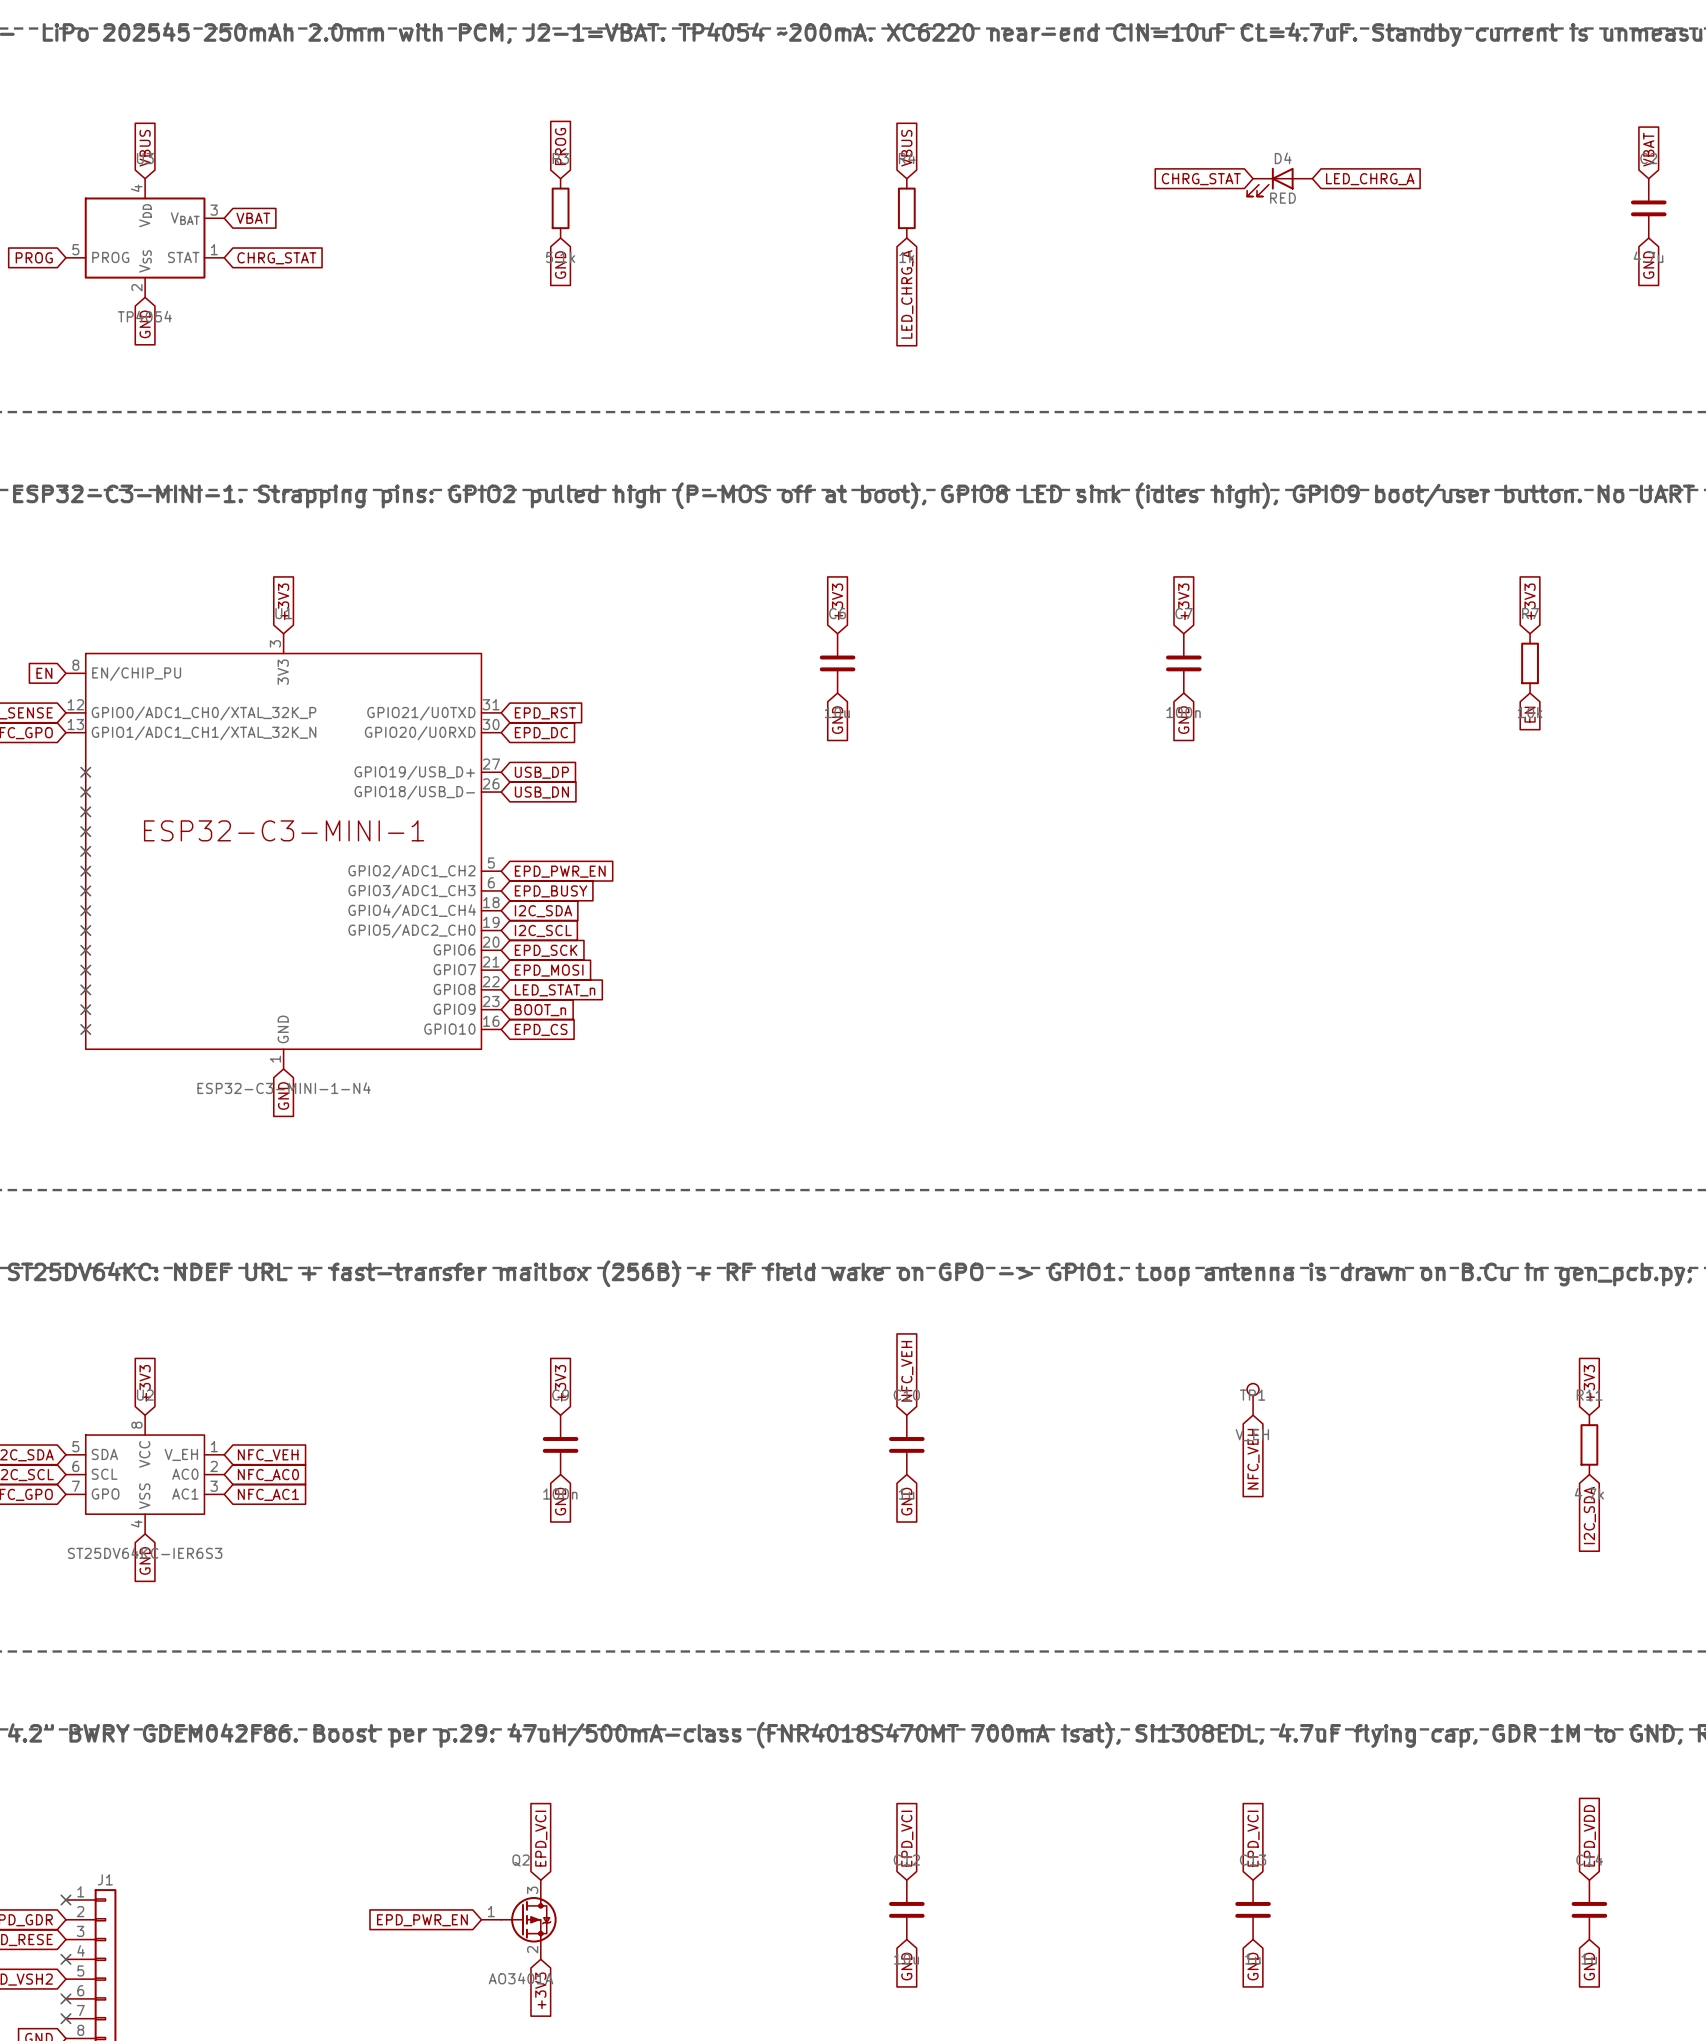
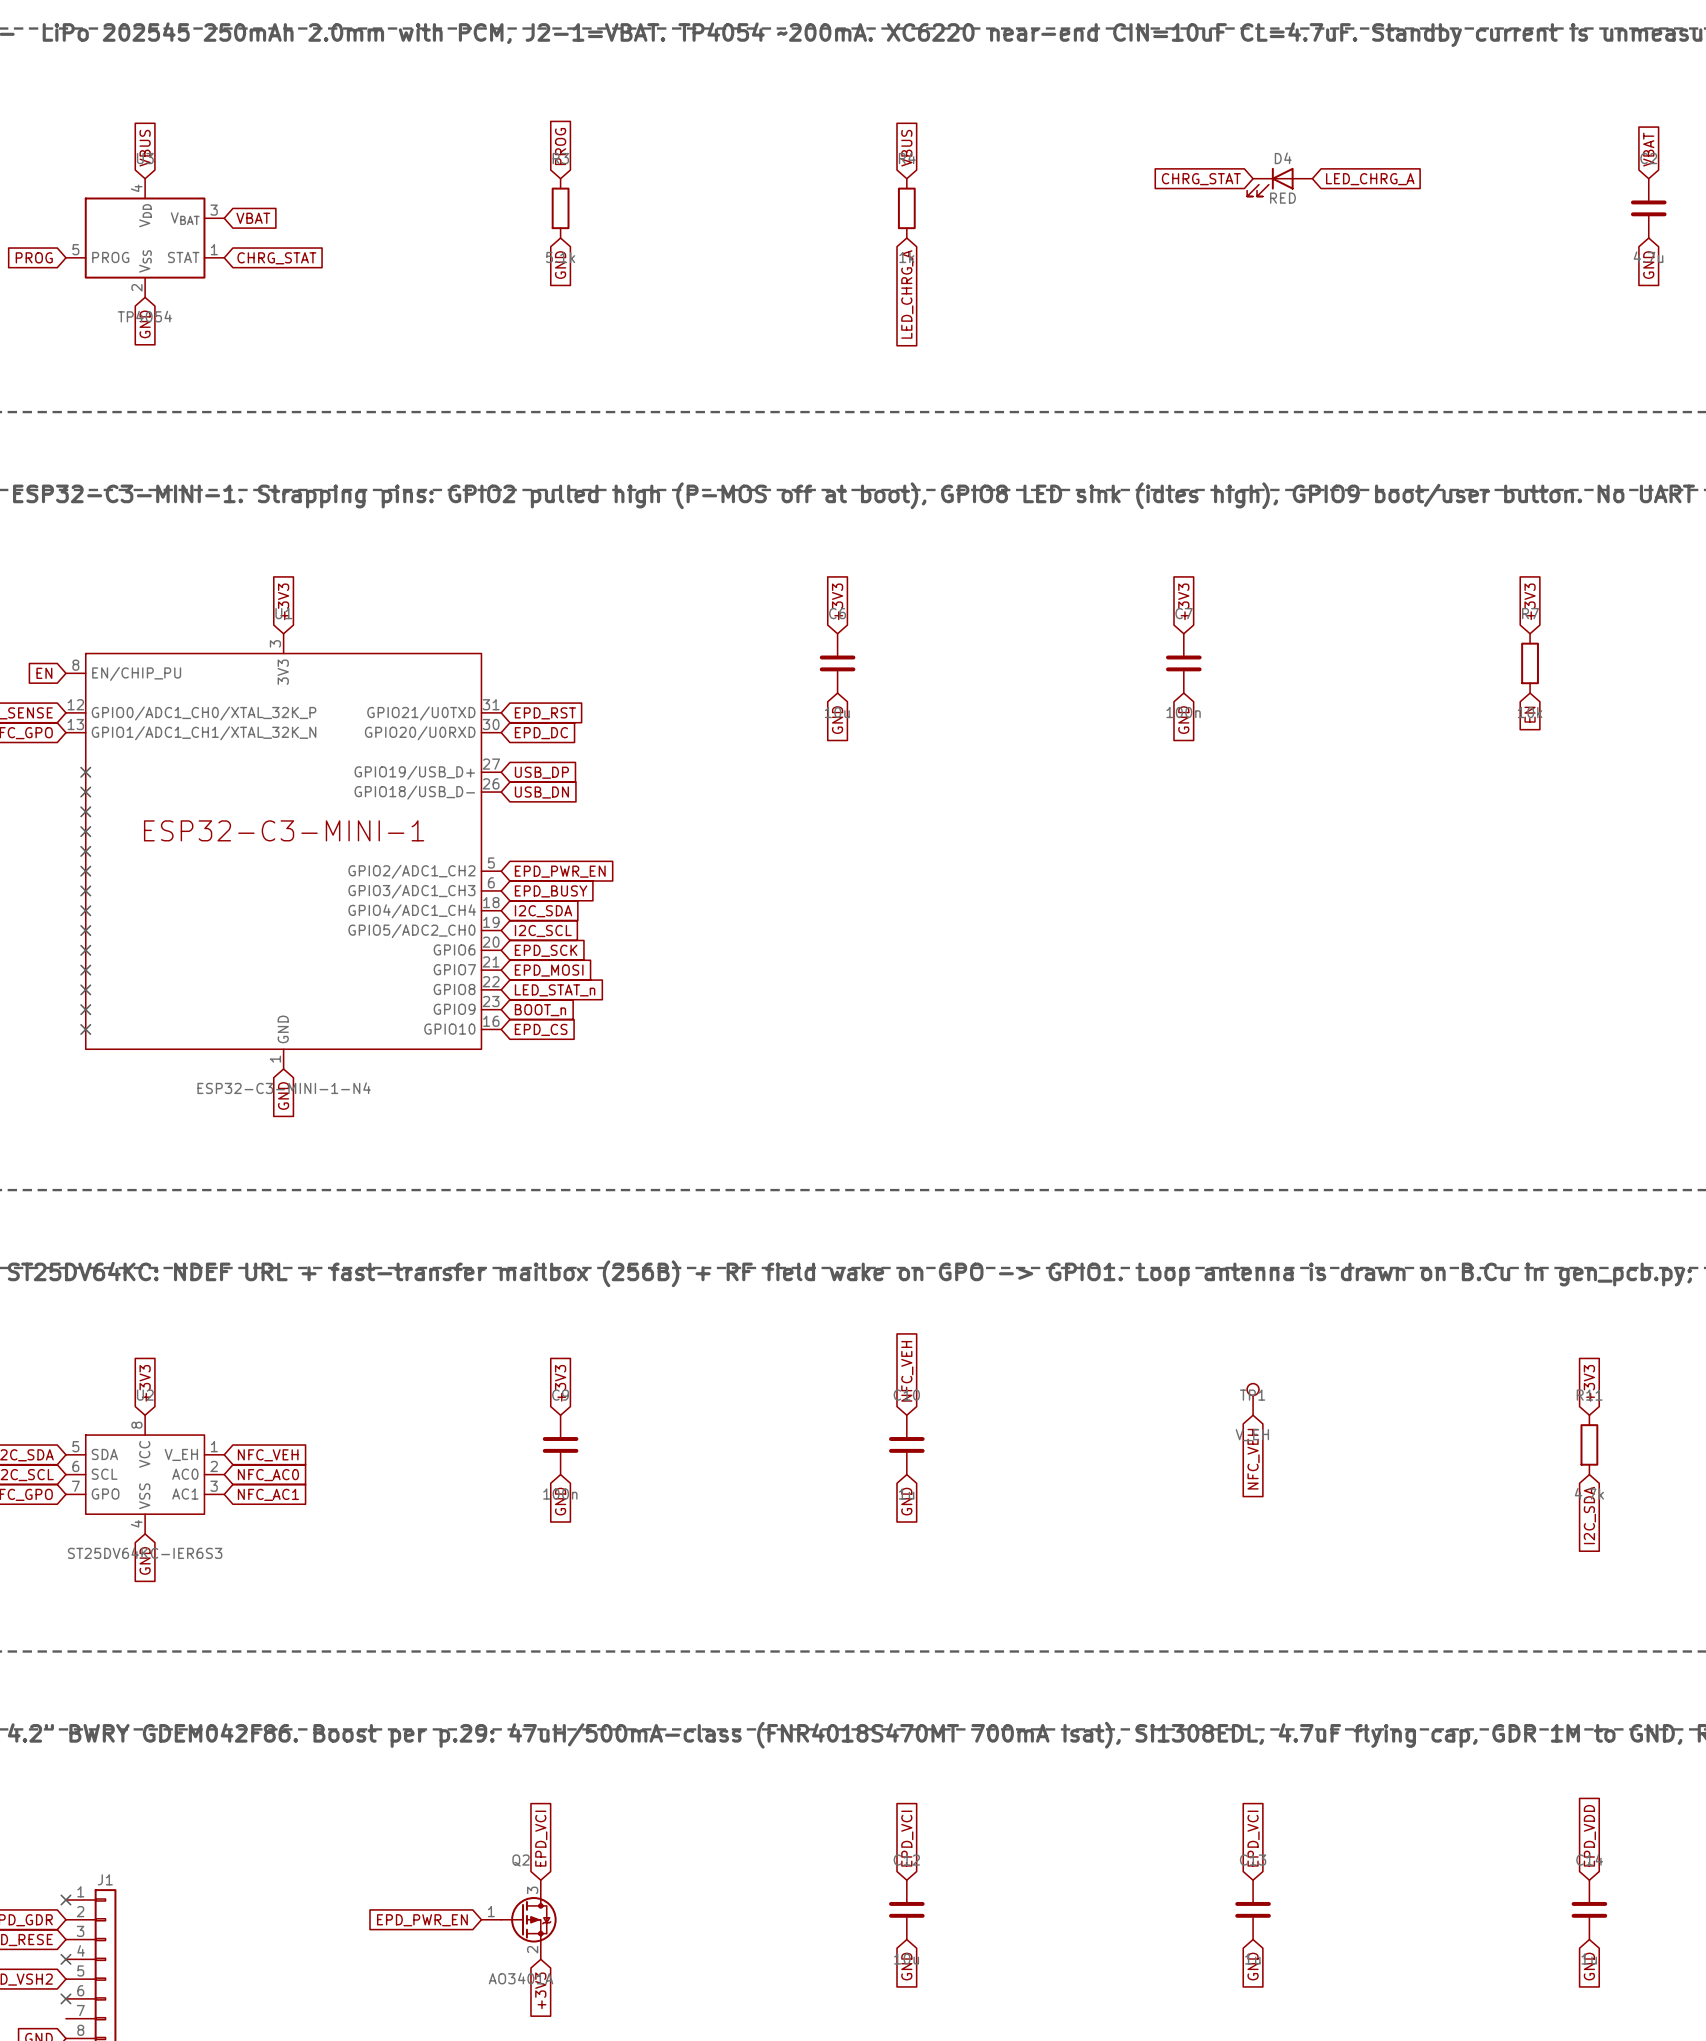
no-connect mark: (65, 2018) -> none

